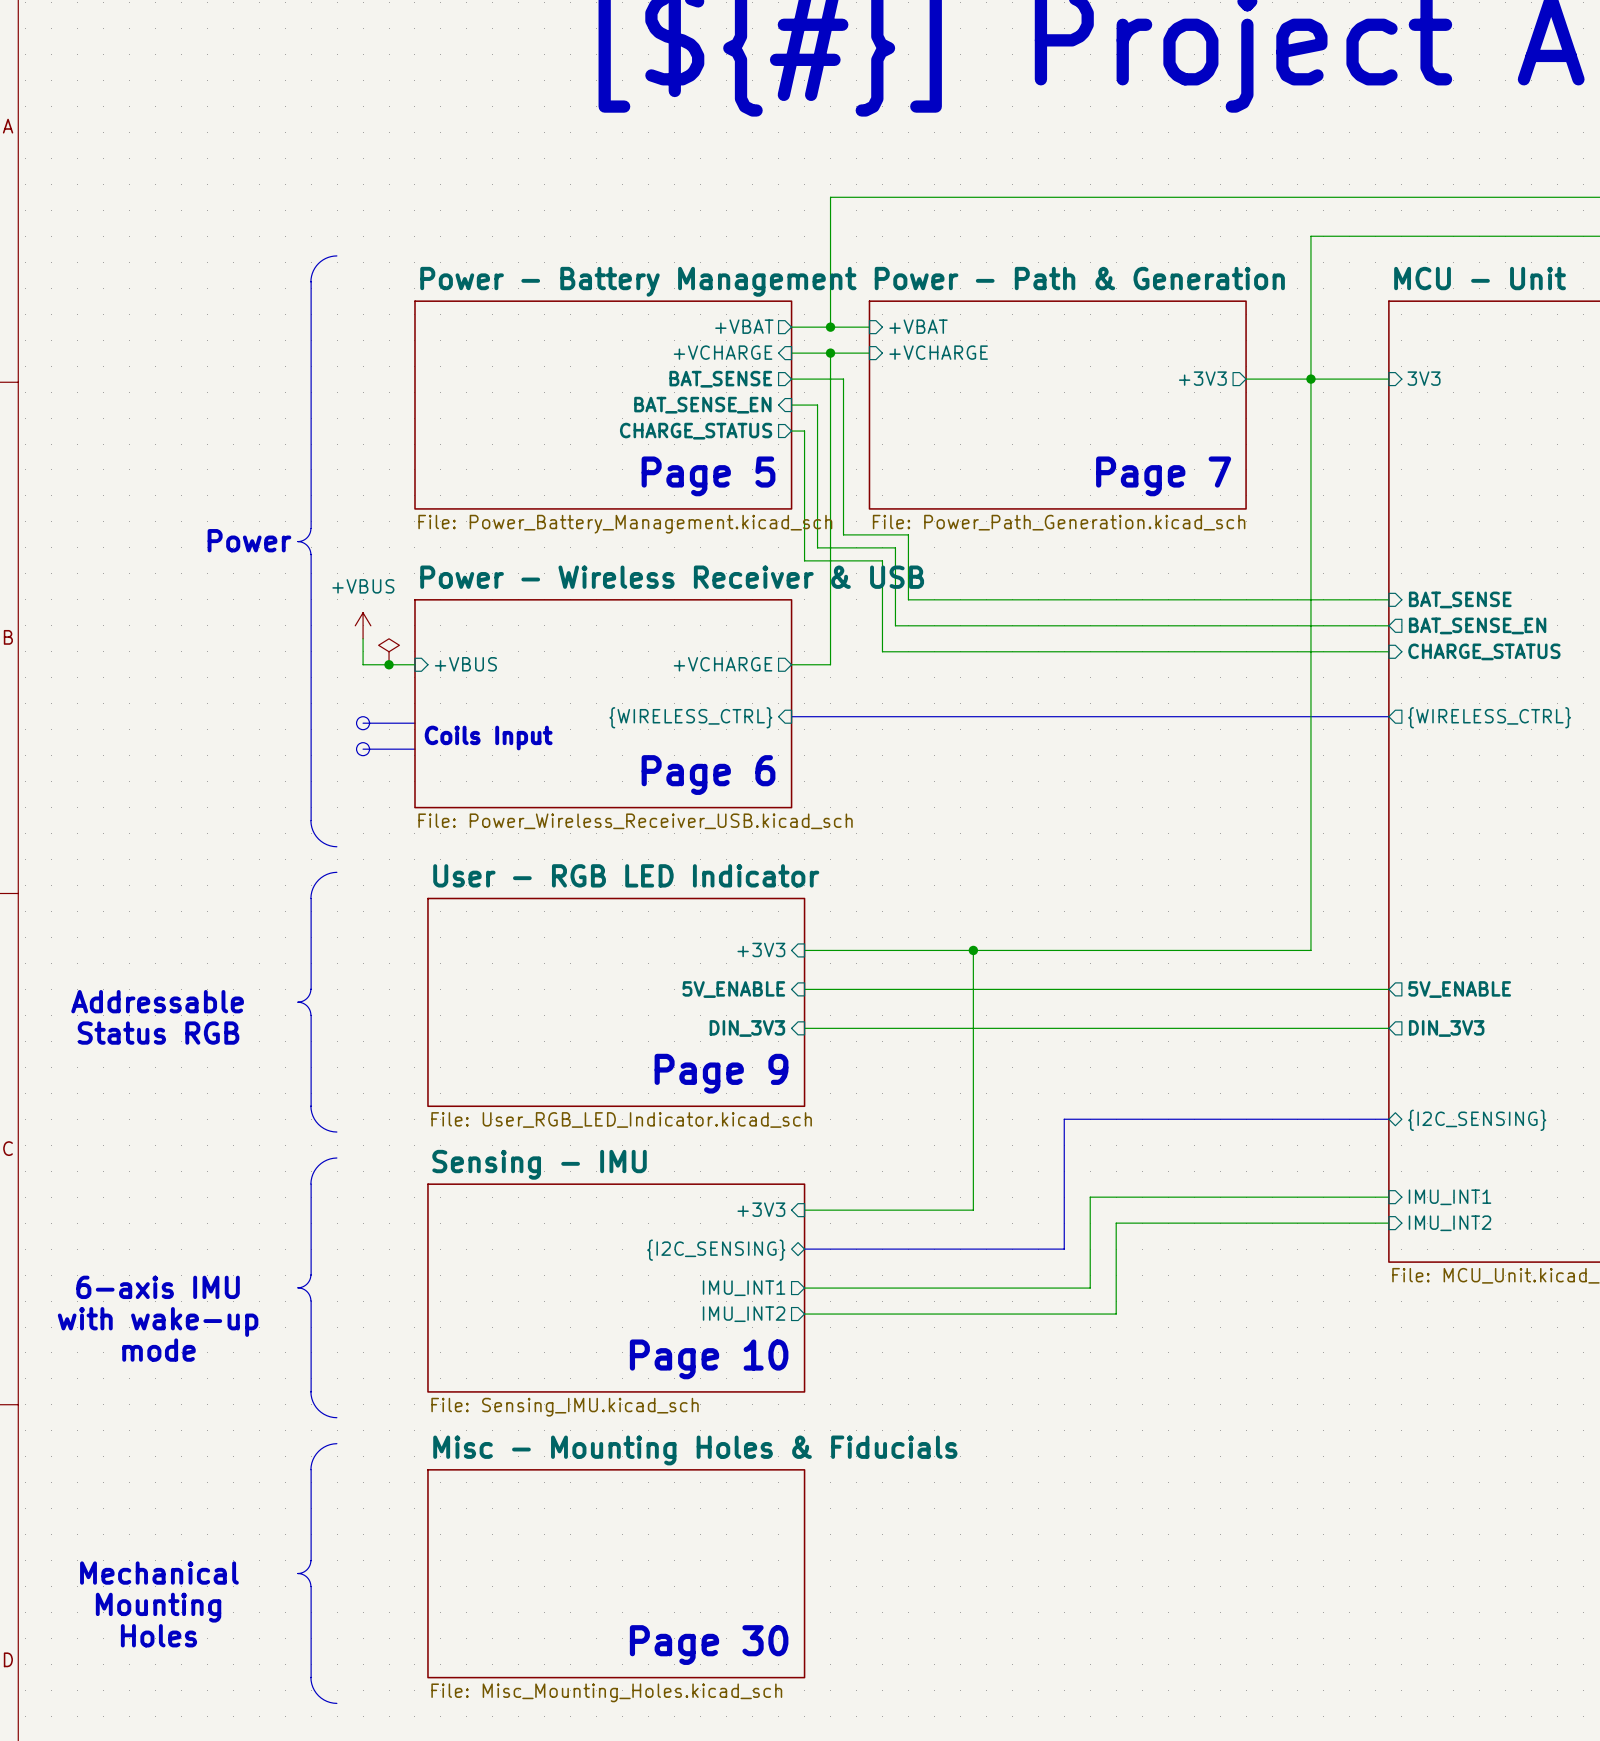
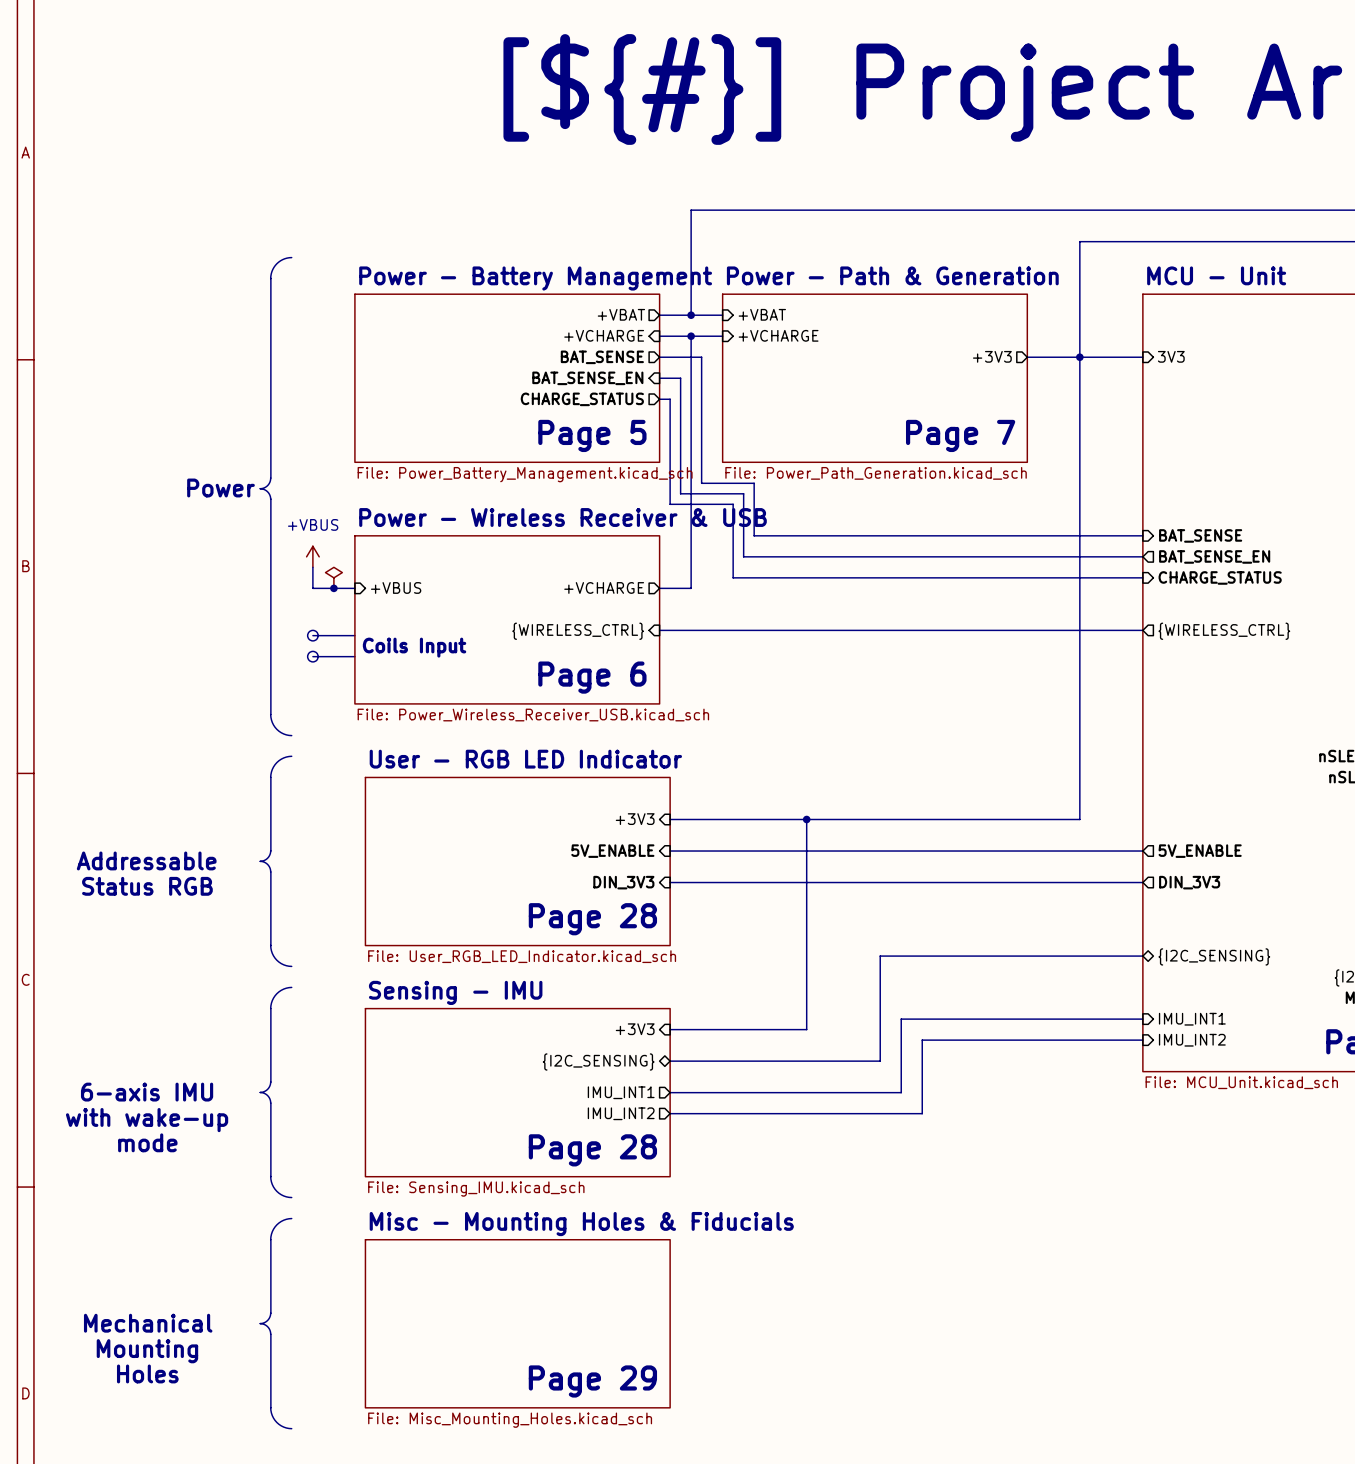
text: Page 9 (721, 1073) -> Page 28 (592, 919)
text: Page 10 (709, 1359) -> Page 28 (592, 1150)
text: Page 30 (709, 1645) -> Page 29 (592, 1381)

